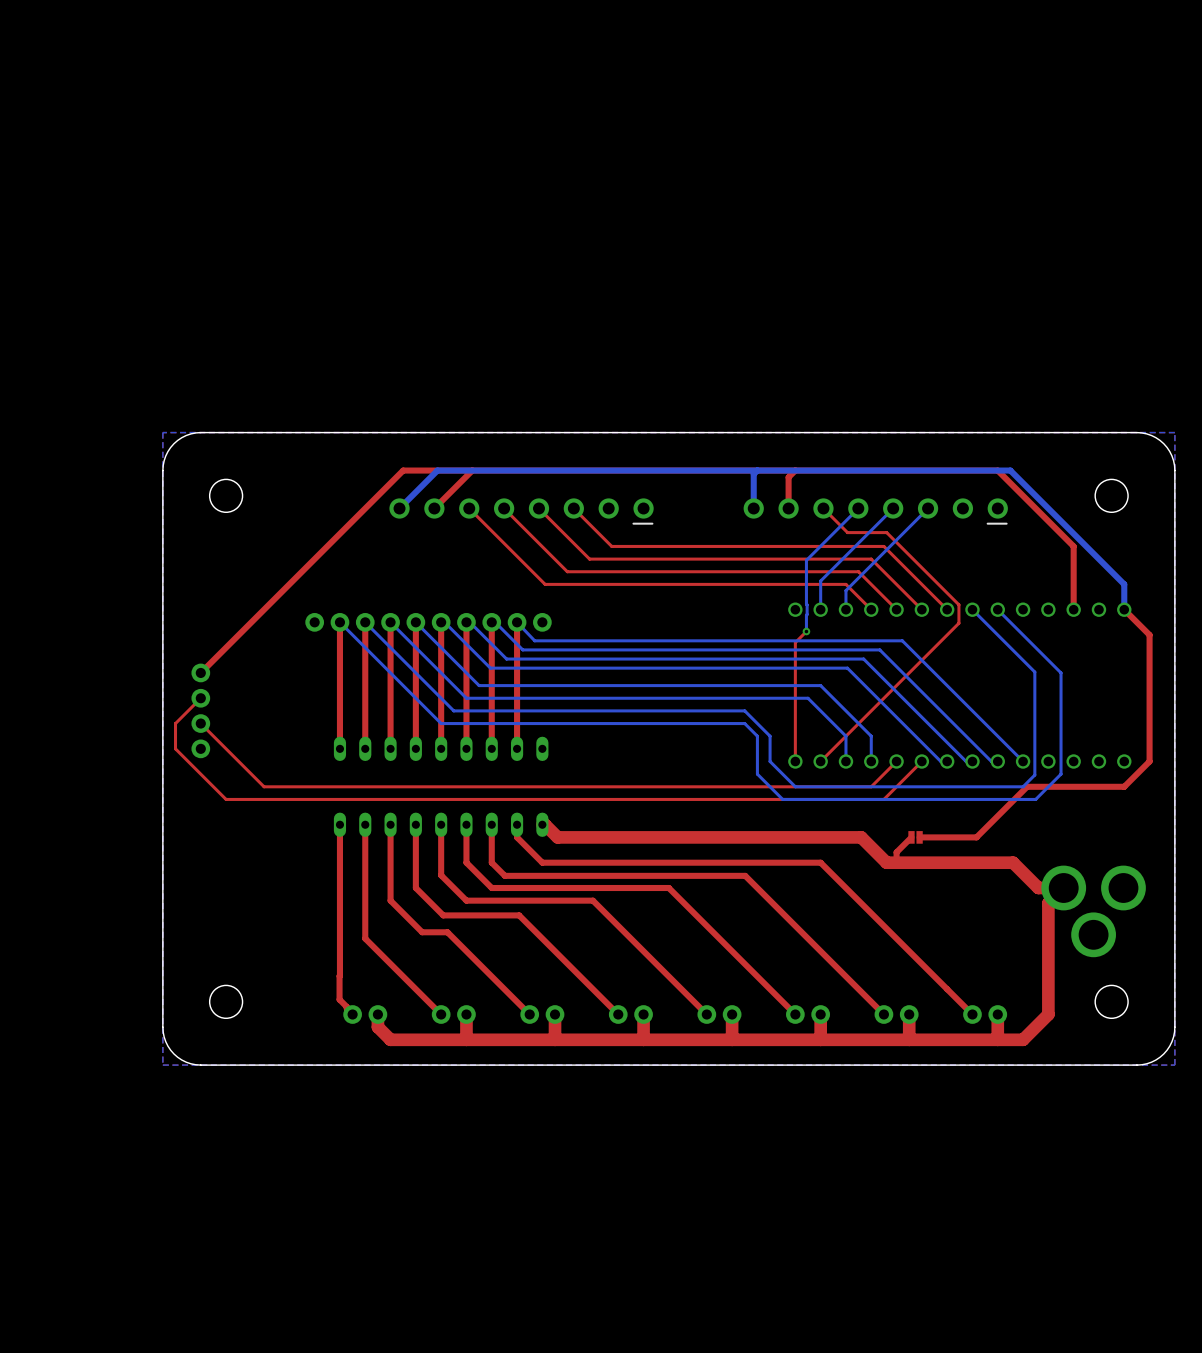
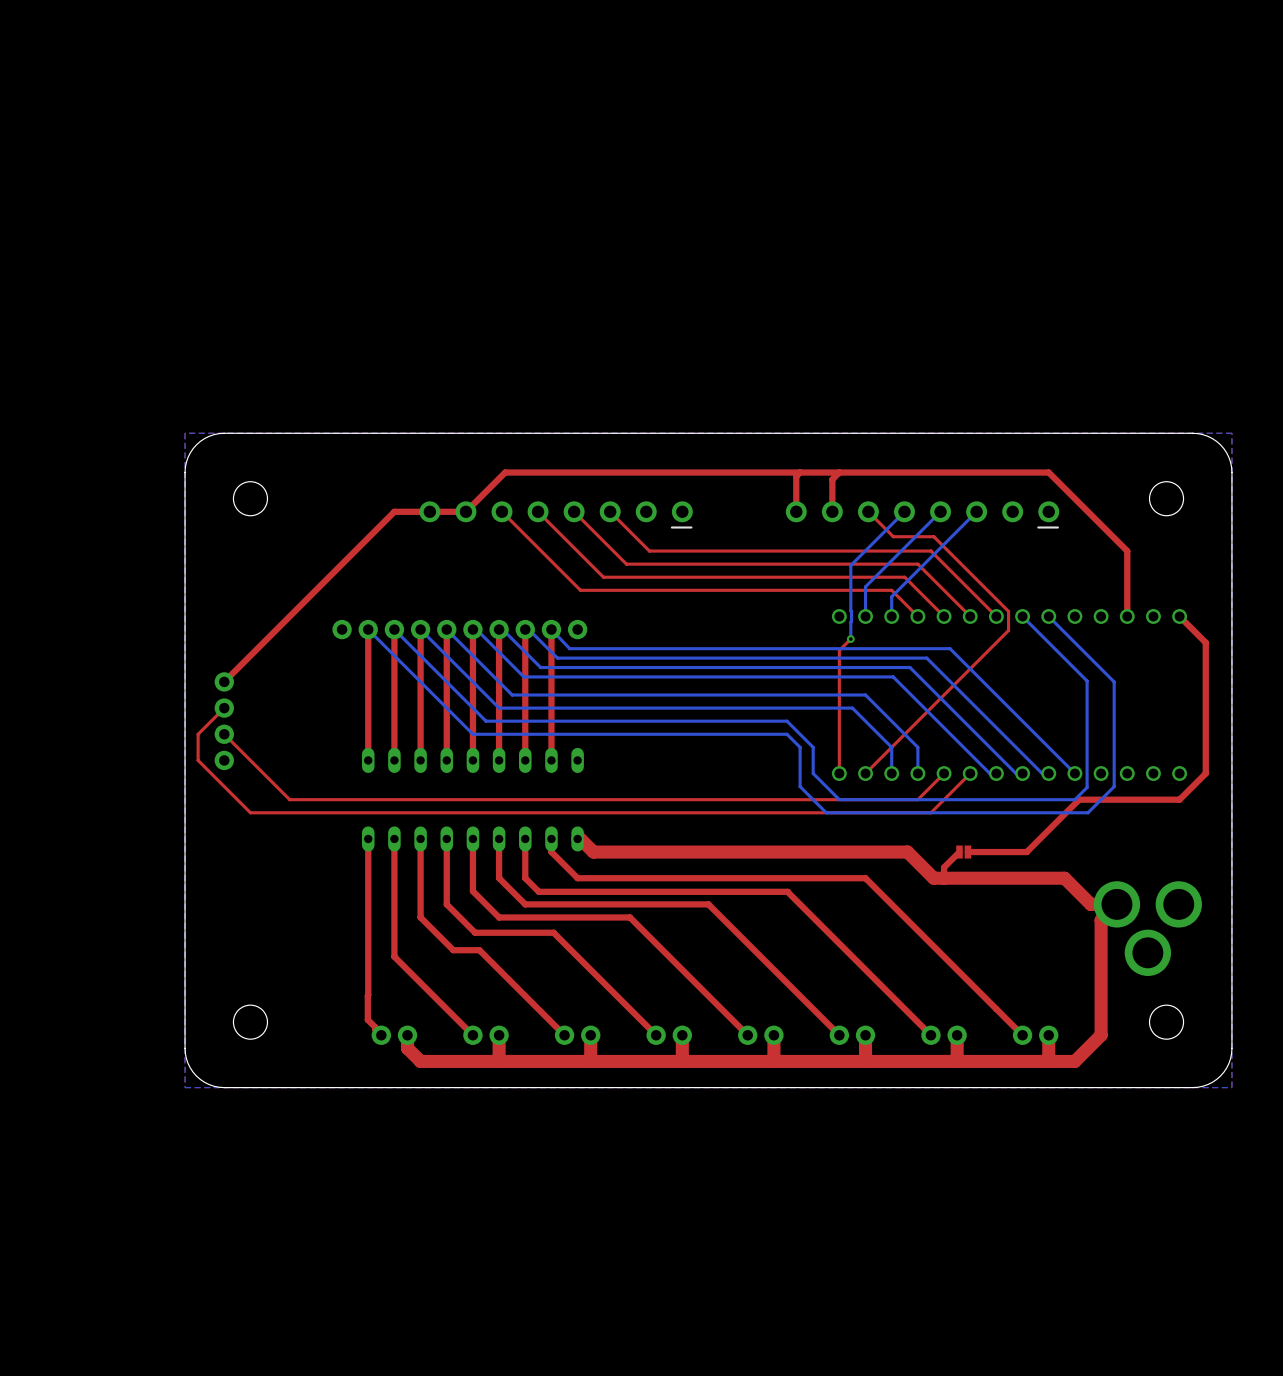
top track: (472, 470) (403, 470) (365, 508) -> (465, 511) (394, 511)
top track: none -> (800, 472) (796, 476) (796, 511)
bottom track: (757, 470) (753, 474) (753, 508) -> none
bottom track: (399, 508) (437, 470) (1010, 470) (1124, 584) (1124, 609) -> none

